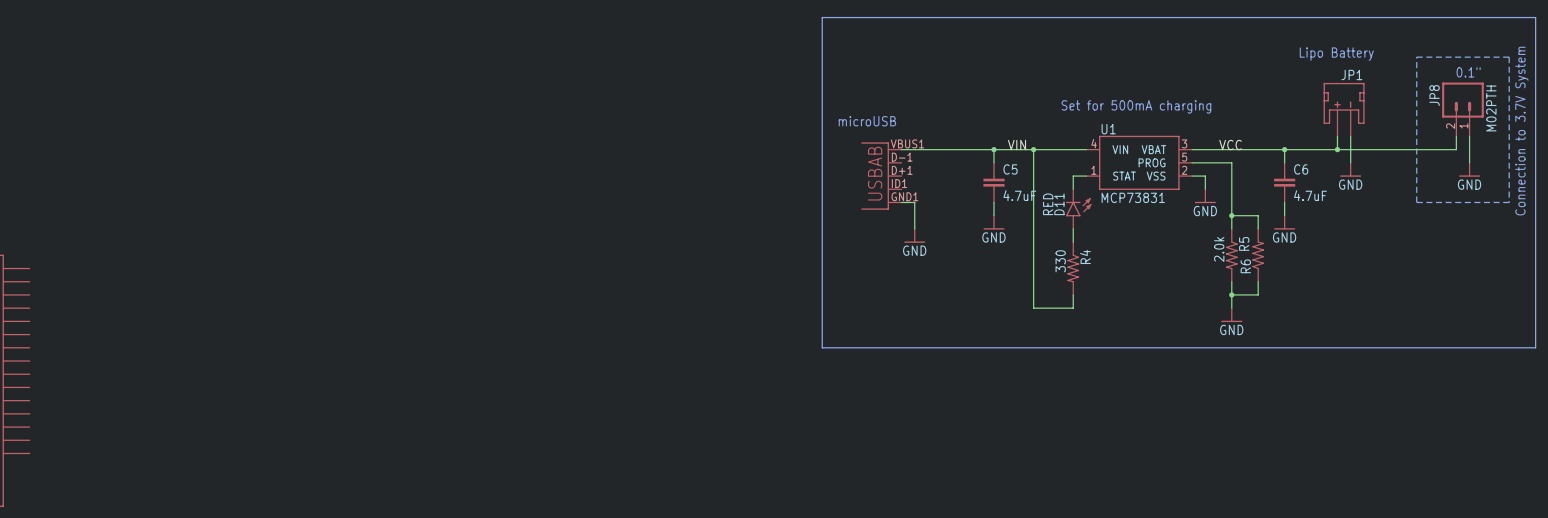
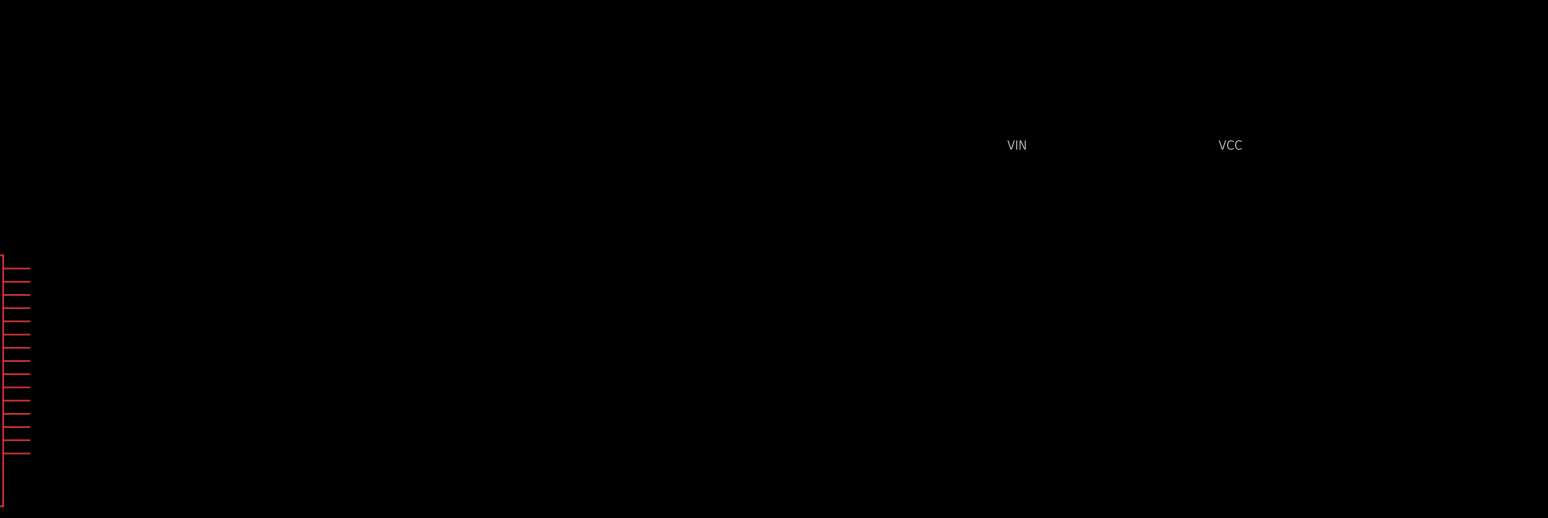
line: (822, 17) (822, 347) (1535, 347) (1535, 17) (822, 17) -> none
text: Lipo Battery (1336, 54) -> none
line: (1416, 57) (1509, 57) (1509, 202) (1416, 202) (1416, 57) -> none
text: 0.1" (1468, 72) -> none
text: Set for 500mA charging (1136, 106) -> none
JP1: (1344, 109) -> none
JP8: M02PTH (1462, 109) -> none
text: microUSB (867, 121) -> none
text: Connection to 3.7V System (1521, 131) -> none
wire: (1337, 136) (1337, 149) -> none
wire: (1350, 136) (1350, 162) -> none
wire: (1456, 136) (1456, 149) (1192, 149) -> none
wire: (1469, 136) (1469, 162) -> none
wire: (901, 149) (1086, 149) -> none
wire: (994, 149) (994, 162) -> none
junction: (994, 149) -> none
wire: (1033, 149) (1033, 308) (1073, 308) (1073, 294) -> none
junction: (1033, 149) -> none
wire: (1284, 149) (1284, 162) -> none
junction: (1284, 149) -> none
junction: (1337, 149) -> none
U1: MCP73831 (1139, 162) -> none
wire: (1192, 162) (1231, 162) (1231, 228) -> none
power symbol: GND (1350, 169) -> none
power symbol: GND (1469, 169) -> none
part: (881, 176) -> none
wire: (1086, 176) (1073, 176) (1073, 189) -> none
wire: (1192, 176) (1205, 176) (1205, 189) -> none
C5: 4.7uF (994, 182) -> none
C6: 4.7uF (1284, 182) -> none
power symbol: GND (1205, 196) -> none
wire: (901, 202) (914, 202) (914, 228) -> none
wire: (994, 202) (994, 215) -> none
wire: (1284, 202) (1284, 215) -> none
D11: RED (1078, 209) -> none
wire: (1231, 215) (1258, 215) (1258, 228) -> none
junction: (1231, 215) -> none
power symbol: GND (994, 222) -> none
power symbol: GND (1284, 222) -> none
wire: (1073, 228) (1073, 242) -> none
power symbol: GND (914, 235) -> none
R5: 2.0k (1231, 255) -> none
R6: (1258, 255) -> none
R4: 330 (1073, 268) -> none
wire: (1231, 281) (1231, 308) -> none
wire: (1258, 281) (1258, 294) (1231, 294) -> none
junction: (1231, 294) -> none
power symbol: GND (1231, 315) -> none

